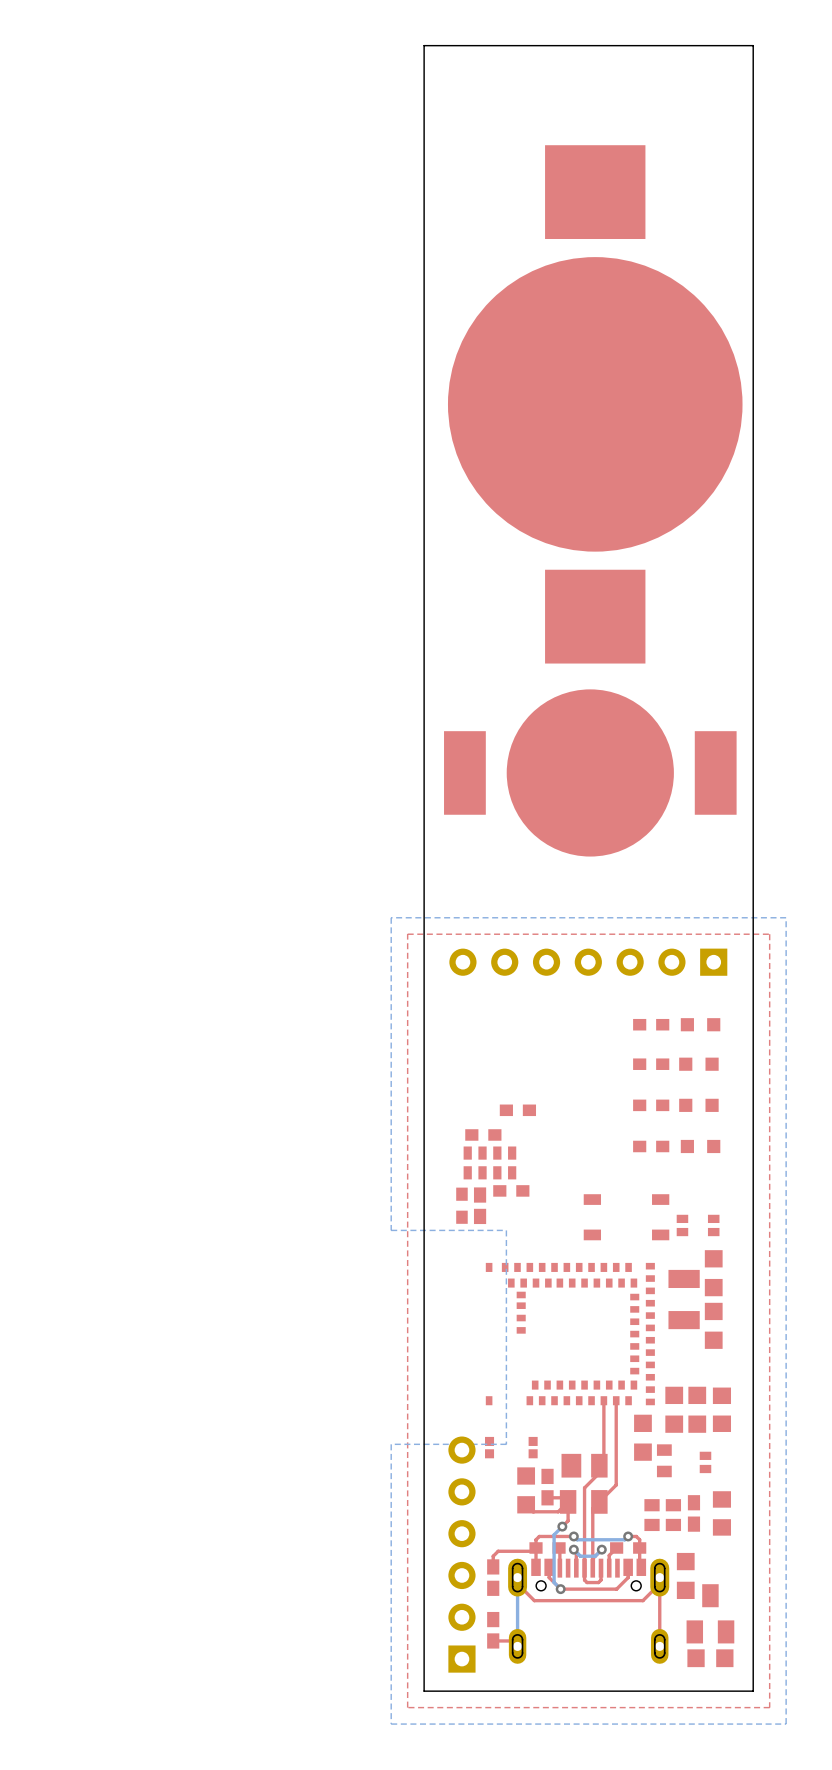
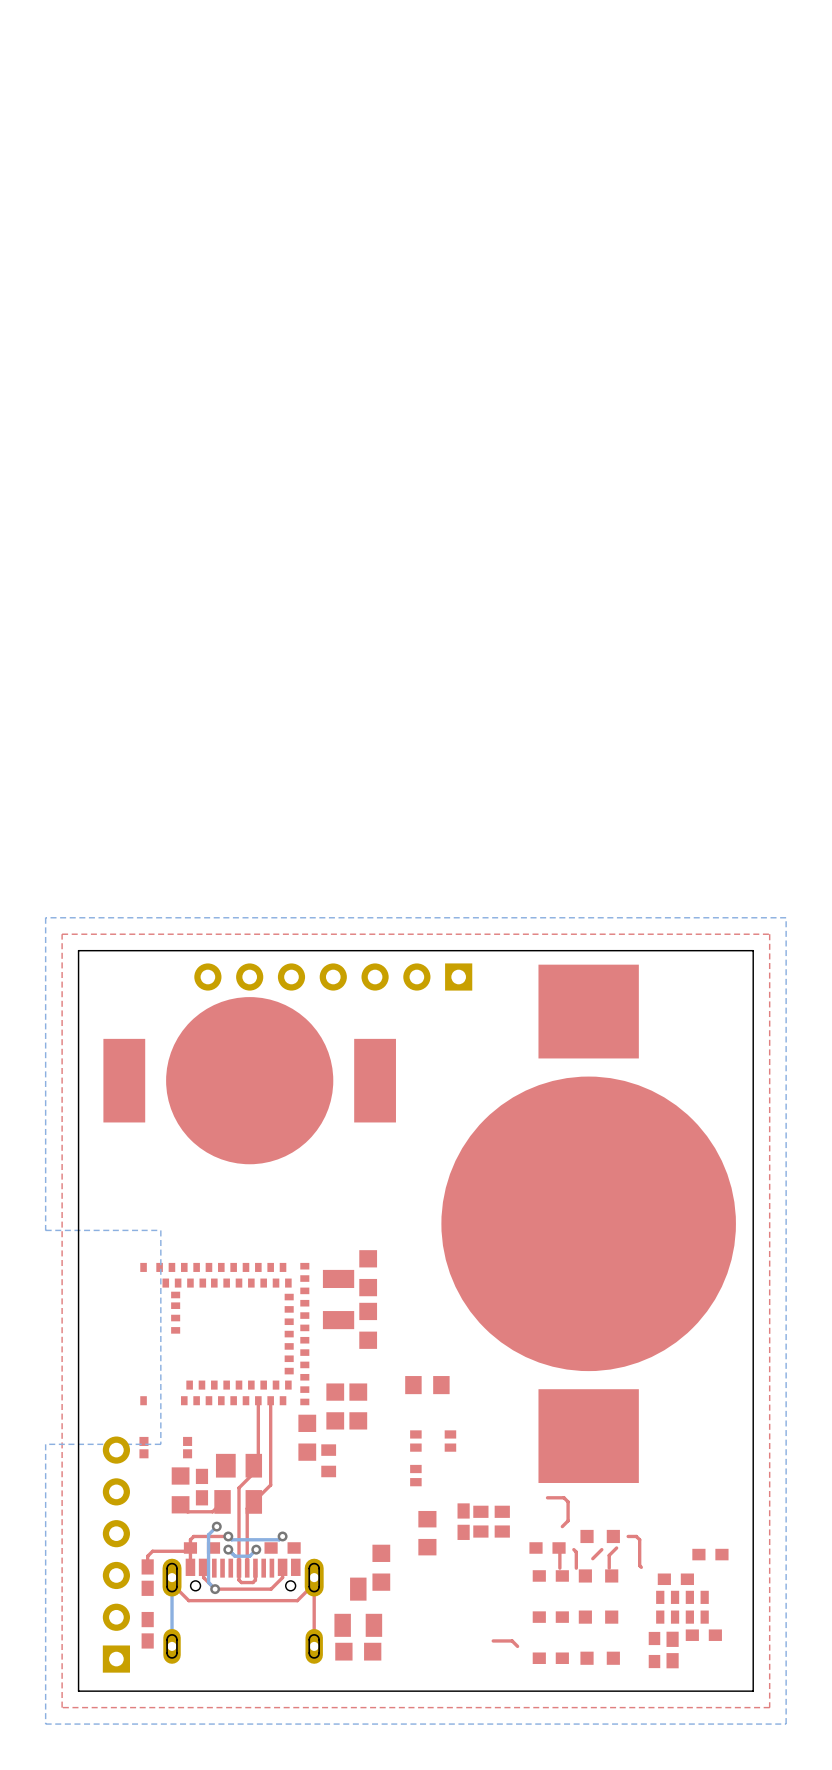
part: (595, 404) -> none
part: (590, 772) -> none
bottom zone outline: (391, 917) (391, 1230) (506, 1230) (506, 1444) (391, 1444) (391, 1724) -> (391, 917) (45, 917) (45, 1230) (160, 1230) (160, 1444) (45, 1444) (45, 1724) (391, 1724)
top zone outline: (407, 934) (407, 1707) -> (407, 934) (62, 934) (62, 1707) (407, 1707)
board edge: (753, 950) (753, 45) (424, 45) (424, 1691) -> (753, 950) (78, 950) (78, 1691) (424, 1691)
part position: (588, 962) -> (333, 977)
part: (651, 1024) -> none
part: (700, 1024) -> none
part: (651, 1064) -> none
part: (698, 1064) -> none
part: none -> (249, 1080)
part: (651, 1105) -> none
part: (698, 1105) -> none
part: (517, 1110) -> none
part: (483, 1134) -> none
part: (651, 1146) -> none
part: (700, 1146) -> none
part: (489, 1162) -> none
part: (511, 1190) -> none
part: (461, 1205) -> none
part: (480, 1205) -> none
part: none -> (588, 1223)
part: (682, 1225) -> none
part: (713, 1225) -> none
part: none -> (368, 1273)
part: (713, 1273) -> none
part position: (684, 1299) -> (338, 1299)
part: none -> (368, 1325)
part: (713, 1325) -> none
part position: (570, 1334) -> (224, 1334)
part: none -> (427, 1385)
top track: (603, 1400) (603, 1461) (599, 1465) (599, 1473) (584, 1487) (584, 1580) (587, 1582) (598, 1582) (601, 1580) (601, 1568) -> (258, 1400) (258, 1461) (253, 1465) (253, 1473) (238, 1487) (238, 1580) (241, 1582) (252, 1582) (255, 1580) (255, 1568)
top track: (616, 1400) (616, 1485) (592, 1508) (592, 1568) -> (270, 1400) (270, 1485) (247, 1508) (247, 1568)
part: none -> (335, 1406)
part: none -> (358, 1406)
part: (674, 1409) -> none
part: (697, 1409) -> none
part: (721, 1409) -> none
part: none -> (307, 1437)
part: (642, 1437) -> none
part: none -> (415, 1441)
part: none -> (450, 1441)
part position: (511, 1447) -> (165, 1447)
part position: (664, 1460) -> (328, 1460)
part: (705, 1462) -> none
part: none -> (415, 1475)
part position: (583, 1483) -> (238, 1483)
part: none -> (201, 1487)
part: (547, 1487) -> none
part: none -> (180, 1490)
part: (526, 1490) -> none
top track: (568, 1501) (558, 1511) (533, 1511) (526, 1504) -> (222, 1501) (212, 1511) (187, 1511) (180, 1504)
part: (662, 1505) -> none
part: none -> (491, 1511)
part: (693, 1513) -> none
part: (721, 1513) -> none
part: none -> (463, 1521)
part: (662, 1524) -> none
via: none -> (216, 1526)
bottom track: (562, 1526) (554, 1534) (554, 1582) (560, 1589) -> (216, 1526) (208, 1534) (208, 1582) (215, 1589)
via: (562, 1526) -> none
part: none -> (491, 1531)
part: none -> (427, 1533)
via: none -> (228, 1536)
via: none -> (282, 1536)
top track: (573, 1536) (539, 1536) (536, 1539) (536, 1567) -> (228, 1536) (193, 1536) (190, 1539) (190, 1567)
via: (573, 1536) -> none
part: none -> (600, 1536)
bottom track: (628, 1536) (624, 1539) (577, 1539) (573, 1536) -> (282, 1536) (279, 1539) (231, 1539) (228, 1536)
via: (628, 1536) -> none
part: none -> (201, 1547)
part: none -> (282, 1547)
top track: (536, 1547) (532, 1551) (498, 1551) (493, 1556) (493, 1566) -> (190, 1547) (187, 1551) (152, 1551) (147, 1556) (147, 1566)
part: (628, 1547) -> none
via: none -> (228, 1549)
via: none -> (256, 1549)
via: (573, 1549) -> none
bottom track: (601, 1549) (595, 1556) (580, 1556) (573, 1549) -> (256, 1549) (249, 1556) (234, 1556) (228, 1549)
via: (601, 1549) -> none
part footprint: [676, 1552, 695, 1600] -> [657, 1573, 694, 1586]
part position: (461, 1554) -> (116, 1554)
part: none -> (710, 1554)
part footprint: [508, 1558, 670, 1664] -> [578, 1610, 619, 1624]
part: none -> (381, 1567)
top track: (628, 1567) (628, 1577) (616, 1589) (560, 1589) (549, 1577) (549, 1567) -> (282, 1567) (282, 1577) (271, 1589) (215, 1589) (203, 1577) (203, 1567)
part: none -> (550, 1575)
part: none -> (598, 1575)
part: none -> (147, 1577)
part: (493, 1577) -> none
top track: (517, 1577) (517, 1583) (534, 1600) (642, 1600) (659, 1583) -> (172, 1577) (172, 1583) (188, 1600) (297, 1600) (314, 1583)
bottom track: (517, 1577) (517, 1646) -> (172, 1577) (172, 1646)
top track: (659, 1577) (659, 1646) -> (314, 1577) (314, 1646)
via: none -> (215, 1589)
via: (560, 1589) -> none
part: none -> (682, 1607)
part: none -> (243, 1611)
part position: (710, 1613) -> (358, 1607)
part: none -> (550, 1617)
part: none -> (147, 1630)
part: (493, 1630) -> none
part: none -> (703, 1635)
part: none -> (654, 1650)
part: none -> (672, 1650)
part: none -> (358, 1651)
part: none -> (550, 1658)
part: none -> (600, 1658)
part: (710, 1658) -> none

